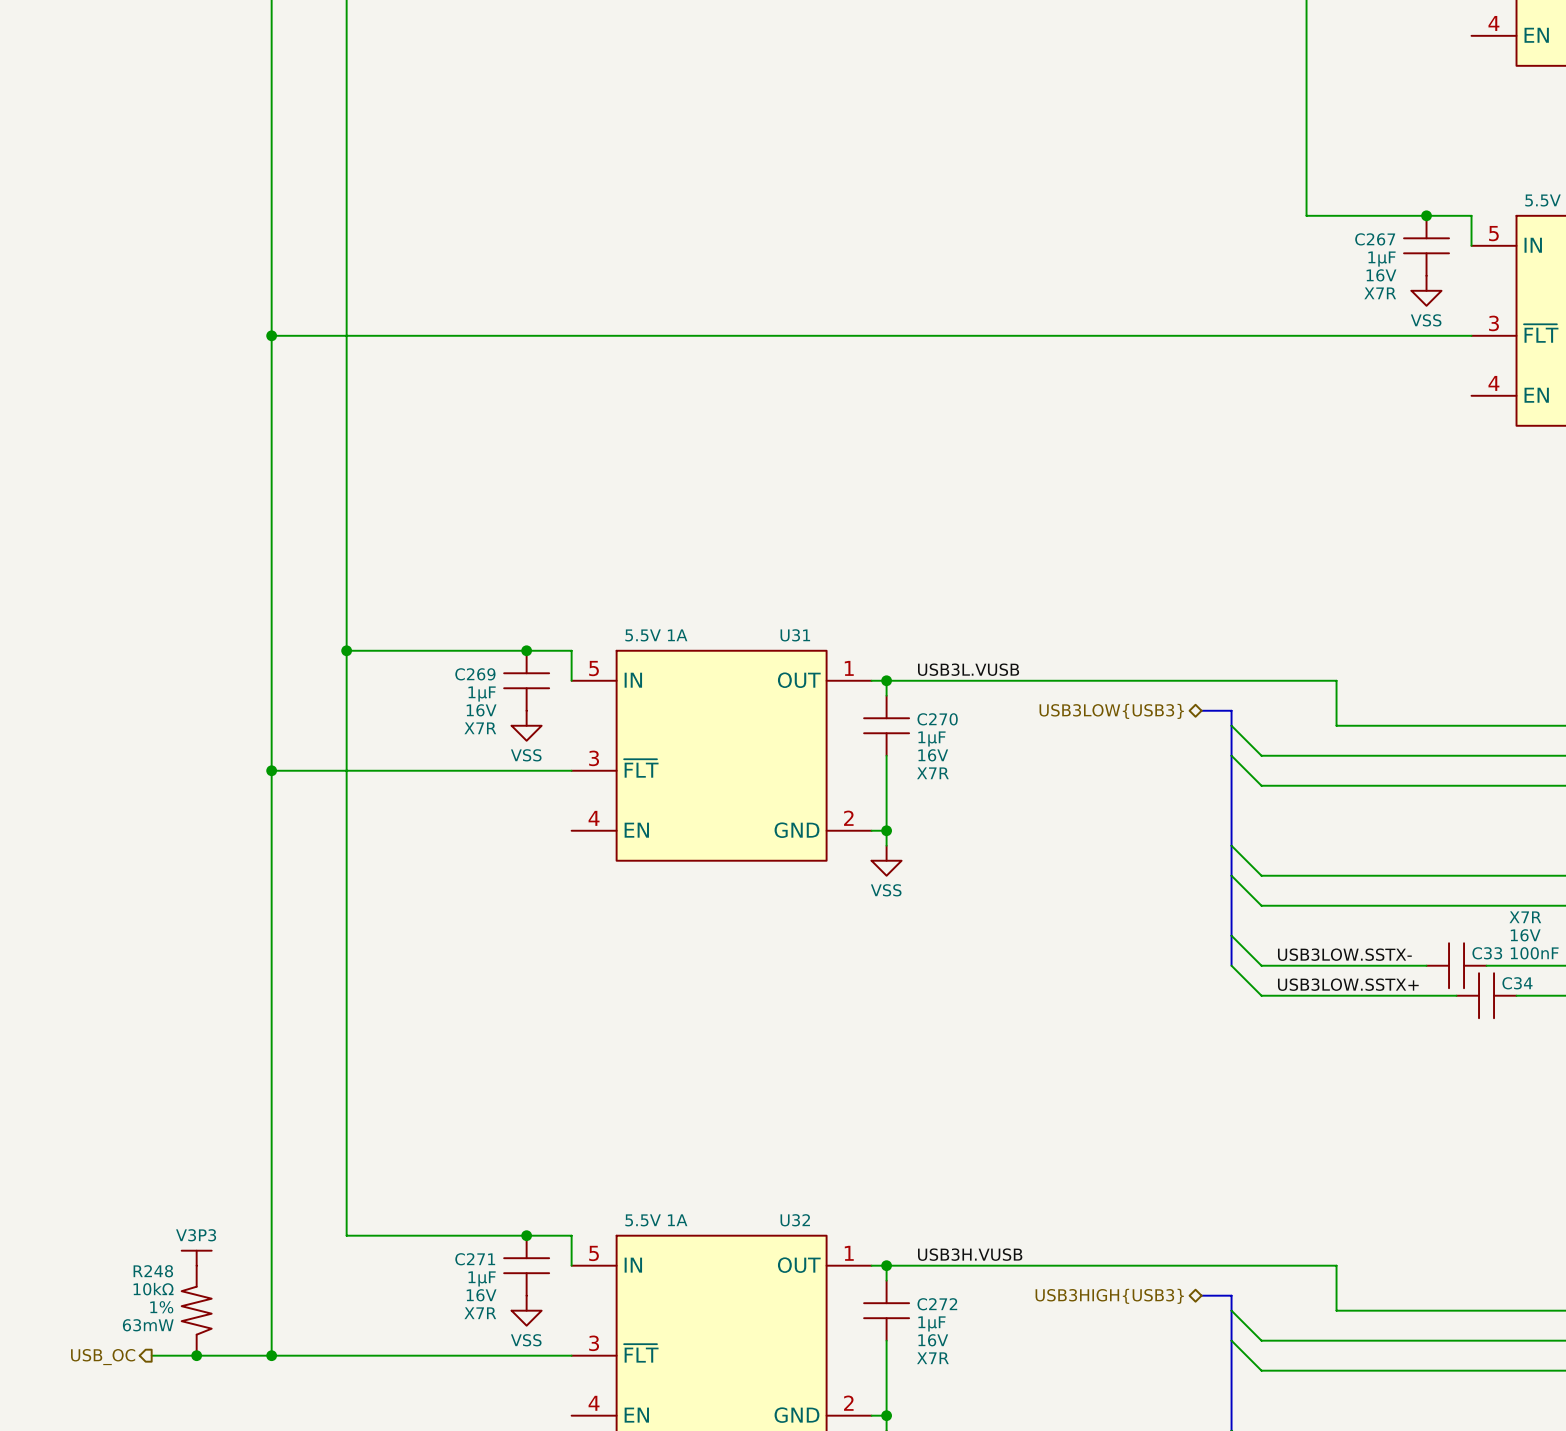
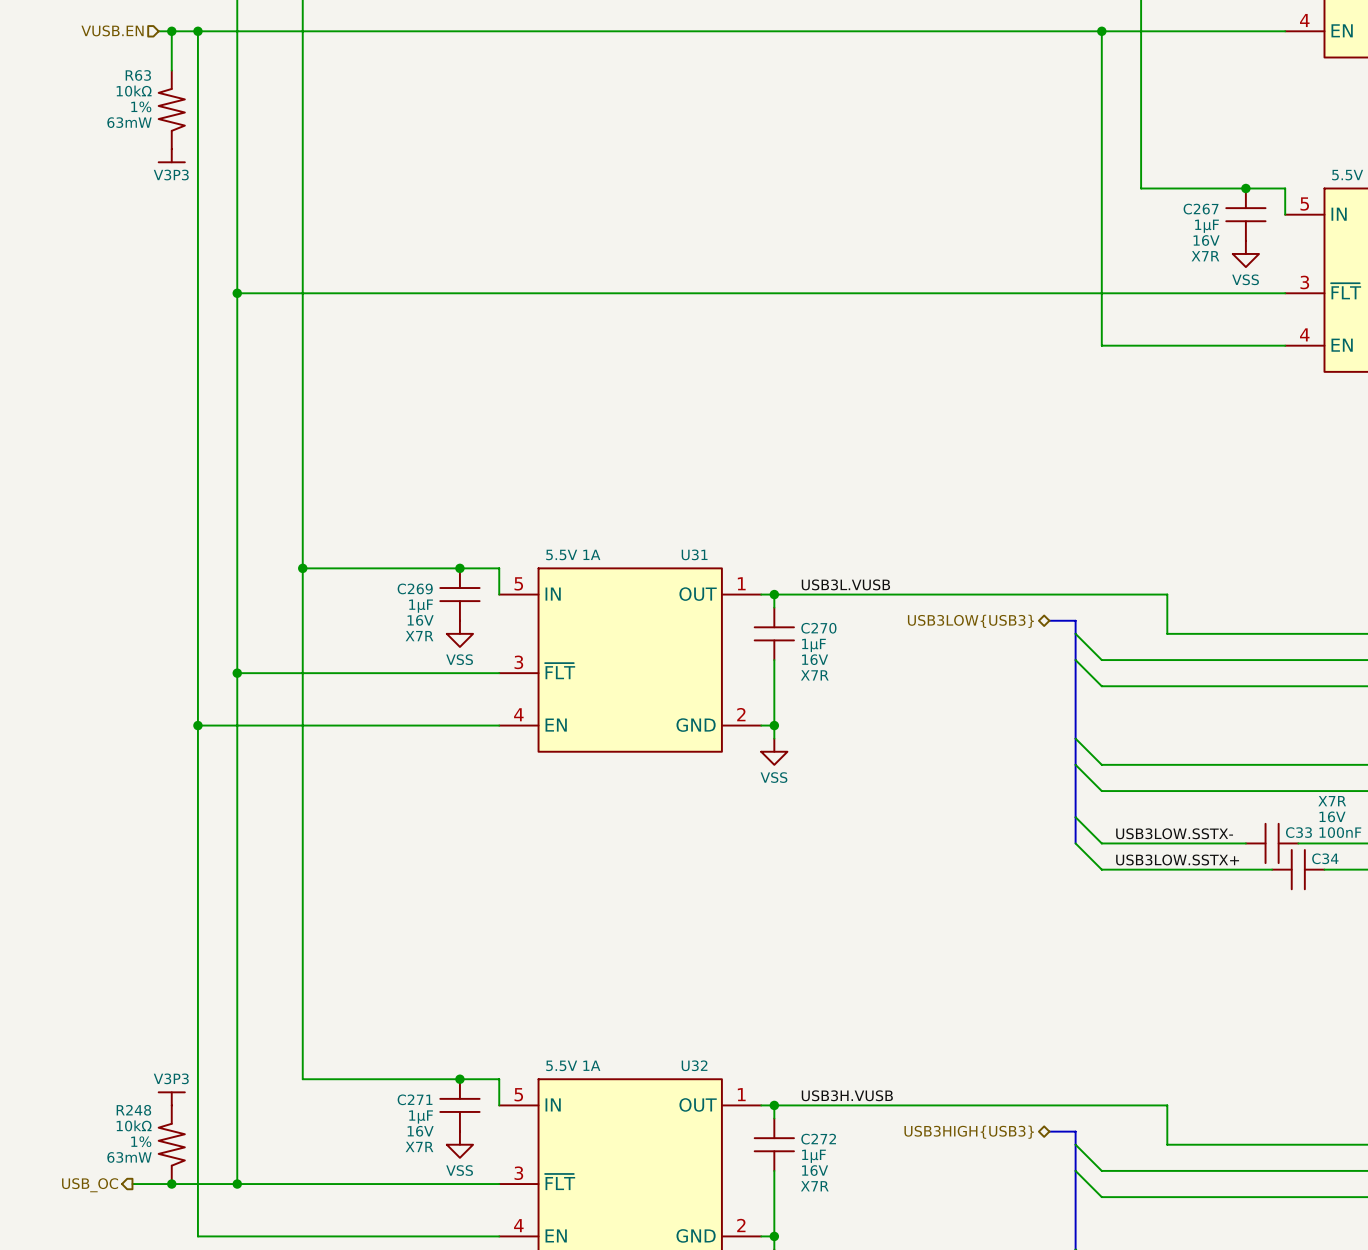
hierarchical label: none -> VUSB.EN (112, 30)
wire: none -> (158, 31) (1285, 31)
wire: none -> (171, 31) (171, 70)
junction: none -> (171, 31)
wire: none -> (197, 31) (197, 1236) (499, 1236)
junction: none -> (197, 31)
wire: none -> (1101, 31) (1101, 345) (1285, 345)
junction: none -> (1101, 31)
R63: none -> (171, 109)
power symbol: none -> V3P3 (171, 155)
wire: none -> (197, 725) (499, 725)
junction: none -> (197, 725)

